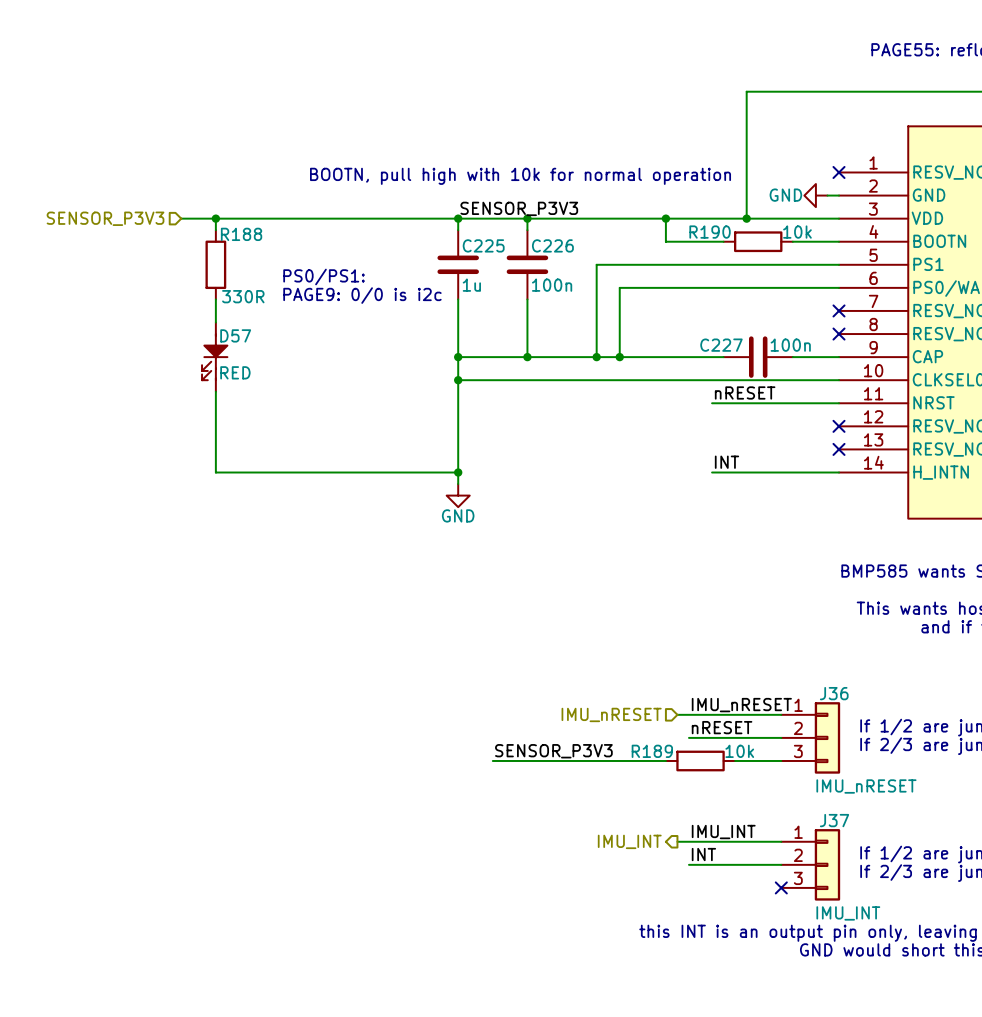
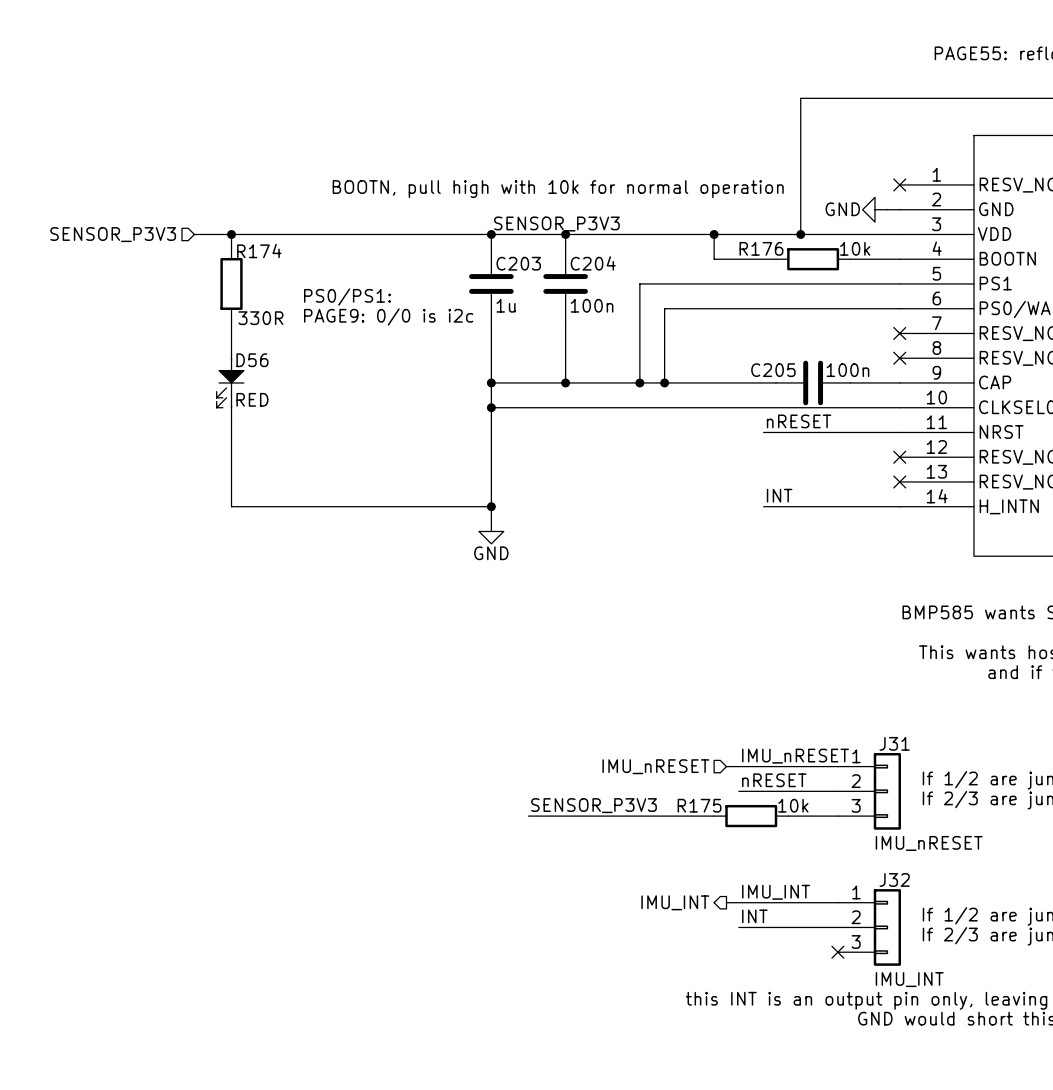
R190 name: R190 (710, 232) -> R176 (761, 248)
R188 name: R188 (241, 234) -> R174 (259, 251)
C225 name: C225 (483, 245) -> C203 (518, 263)
C226 name: C226 (552, 245) -> C204 (593, 263)
D57 name: D57 (235, 335) -> D56 (252, 360)
C227 name: C227 (721, 345) -> C205 (773, 370)
J36 name: J36 (834, 693) -> J31 (894, 743)
R189 name: R189 (652, 751) -> R175 (699, 805)
J37 name: J37 (834, 820) -> J32 (894, 879)

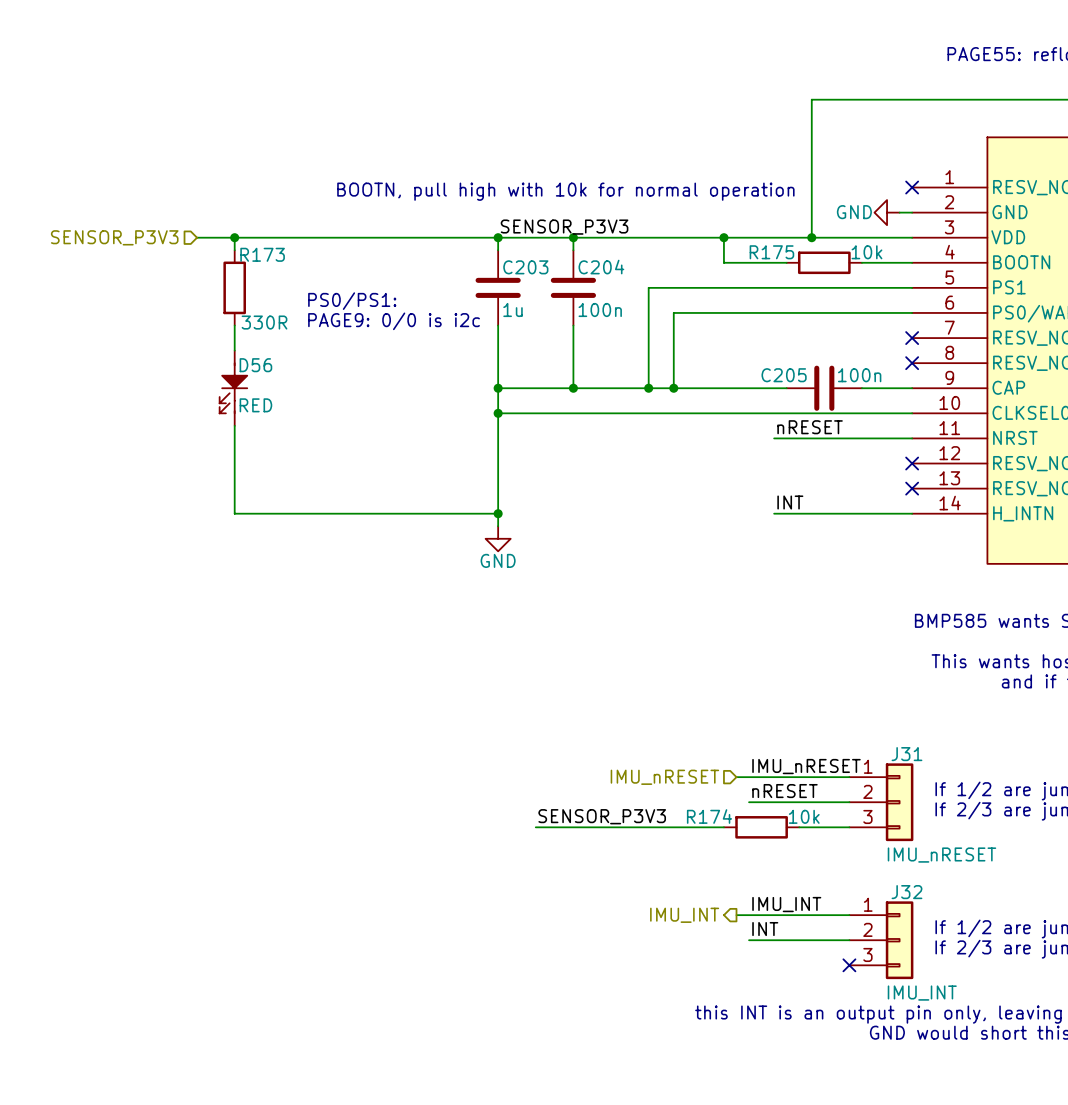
R176 name: R176 (761, 248) -> R175 (771, 252)
R174 name: R174 (259, 251) -> R173 (262, 254)
R175 name: R175 (699, 805) -> R174 (709, 816)

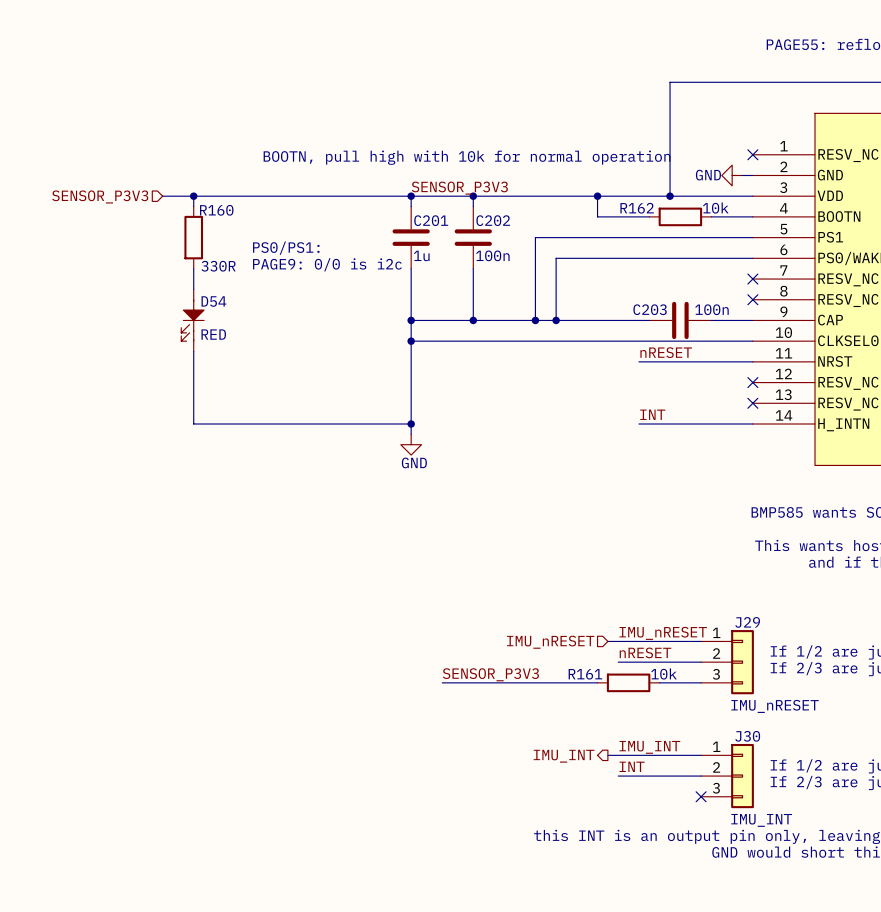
R175 name: R175 (771, 252) -> R162 (637, 208)
R173 name: R173 (262, 254) -> R160 (216, 210)
C203 name: C203 (525, 267) -> C201 (431, 220)
C204 name: C204 (601, 267) -> C202 (493, 220)
D56 name: D56 (255, 365) -> D54 (213, 301)
C205 name: C205 (784, 375) -> C203 (650, 309)
J31 name: J31 (906, 754) -> J29 (747, 622)
R174 name: R174 (709, 816) -> R161 (585, 674)
J32 name: J32 (906, 892) -> J30 (747, 736)

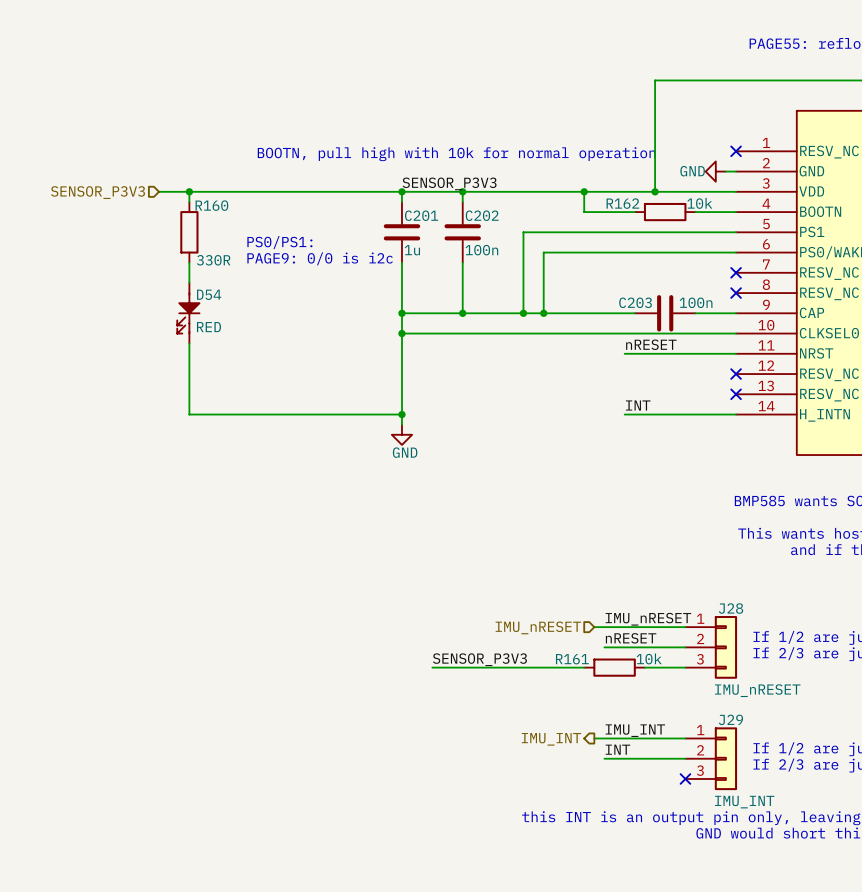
J29 name: J29 (747, 622) -> J28 (731, 608)
J30 name: J30 (747, 736) -> J29 (730, 719)

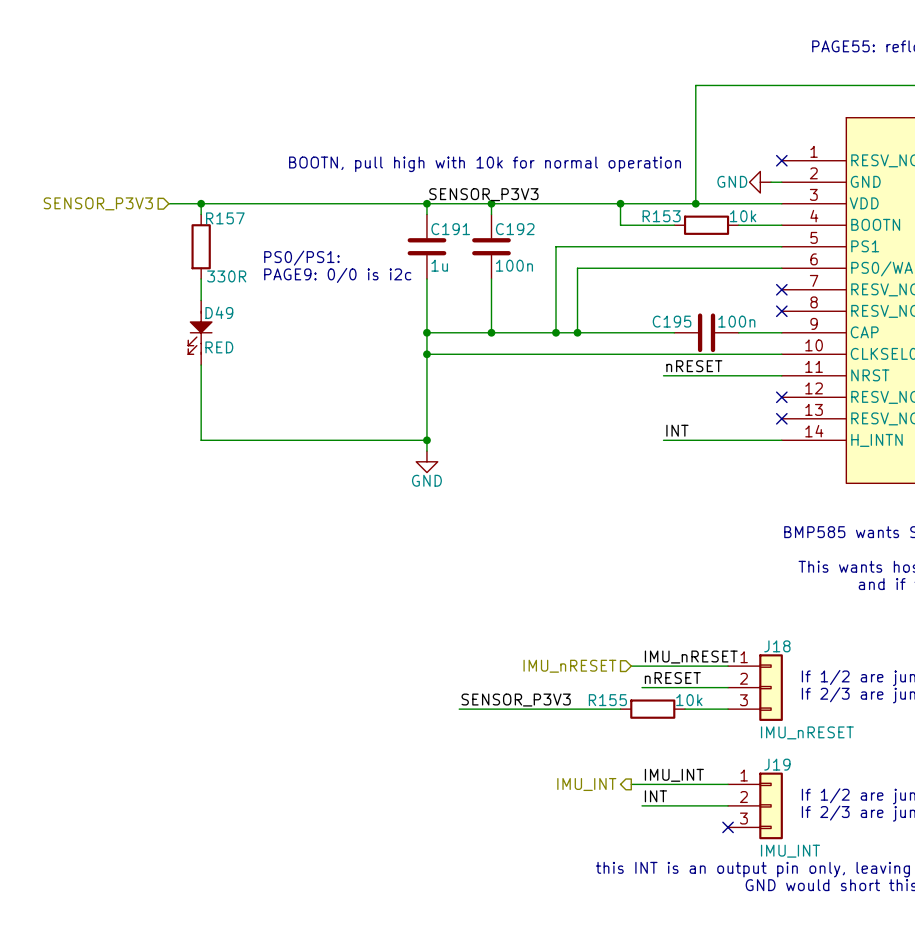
R162 name: R162 (622, 203) -> R153 (661, 216)
R160 name: R160 (211, 205) -> R157 (225, 218)
C201 name: C201 (421, 215) -> C191 (450, 229)
C202 name: C202 (482, 215) -> C192 (515, 229)
D54 name: D54 (209, 294) -> D49 (219, 312)
C203 name: C203 (635, 302) -> C195 (672, 321)
J28 name: J28 (731, 608) -> J18 (777, 646)
R161 name: R161 (572, 659) -> R155 (607, 700)
J29 name: J29 (730, 719) -> J19 (777, 764)

